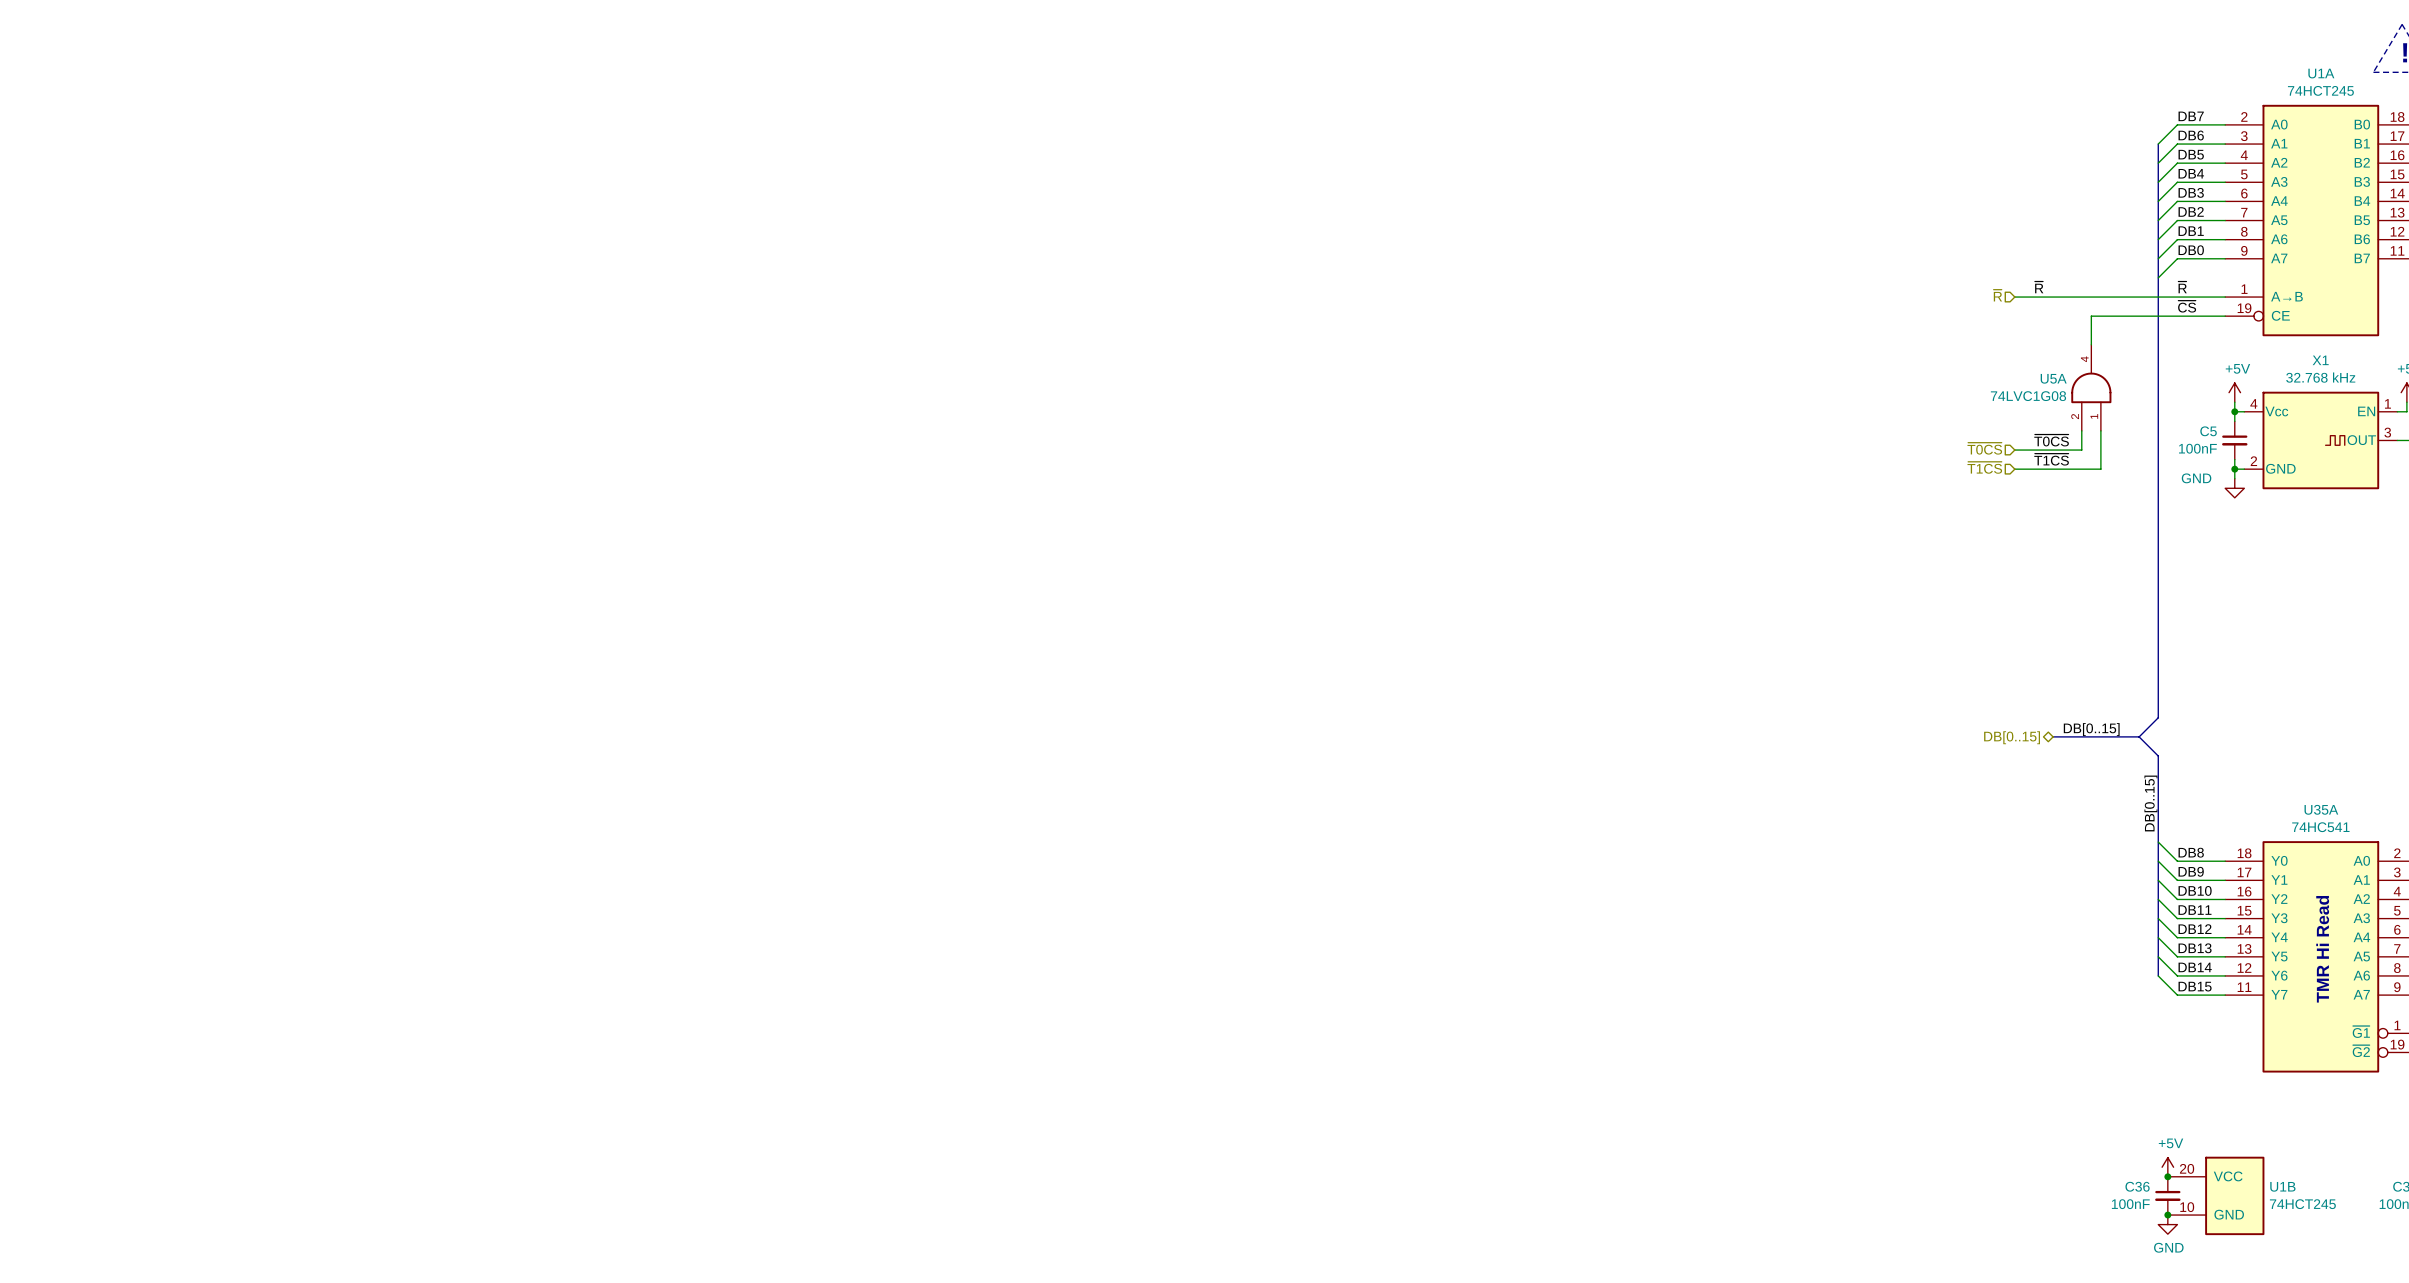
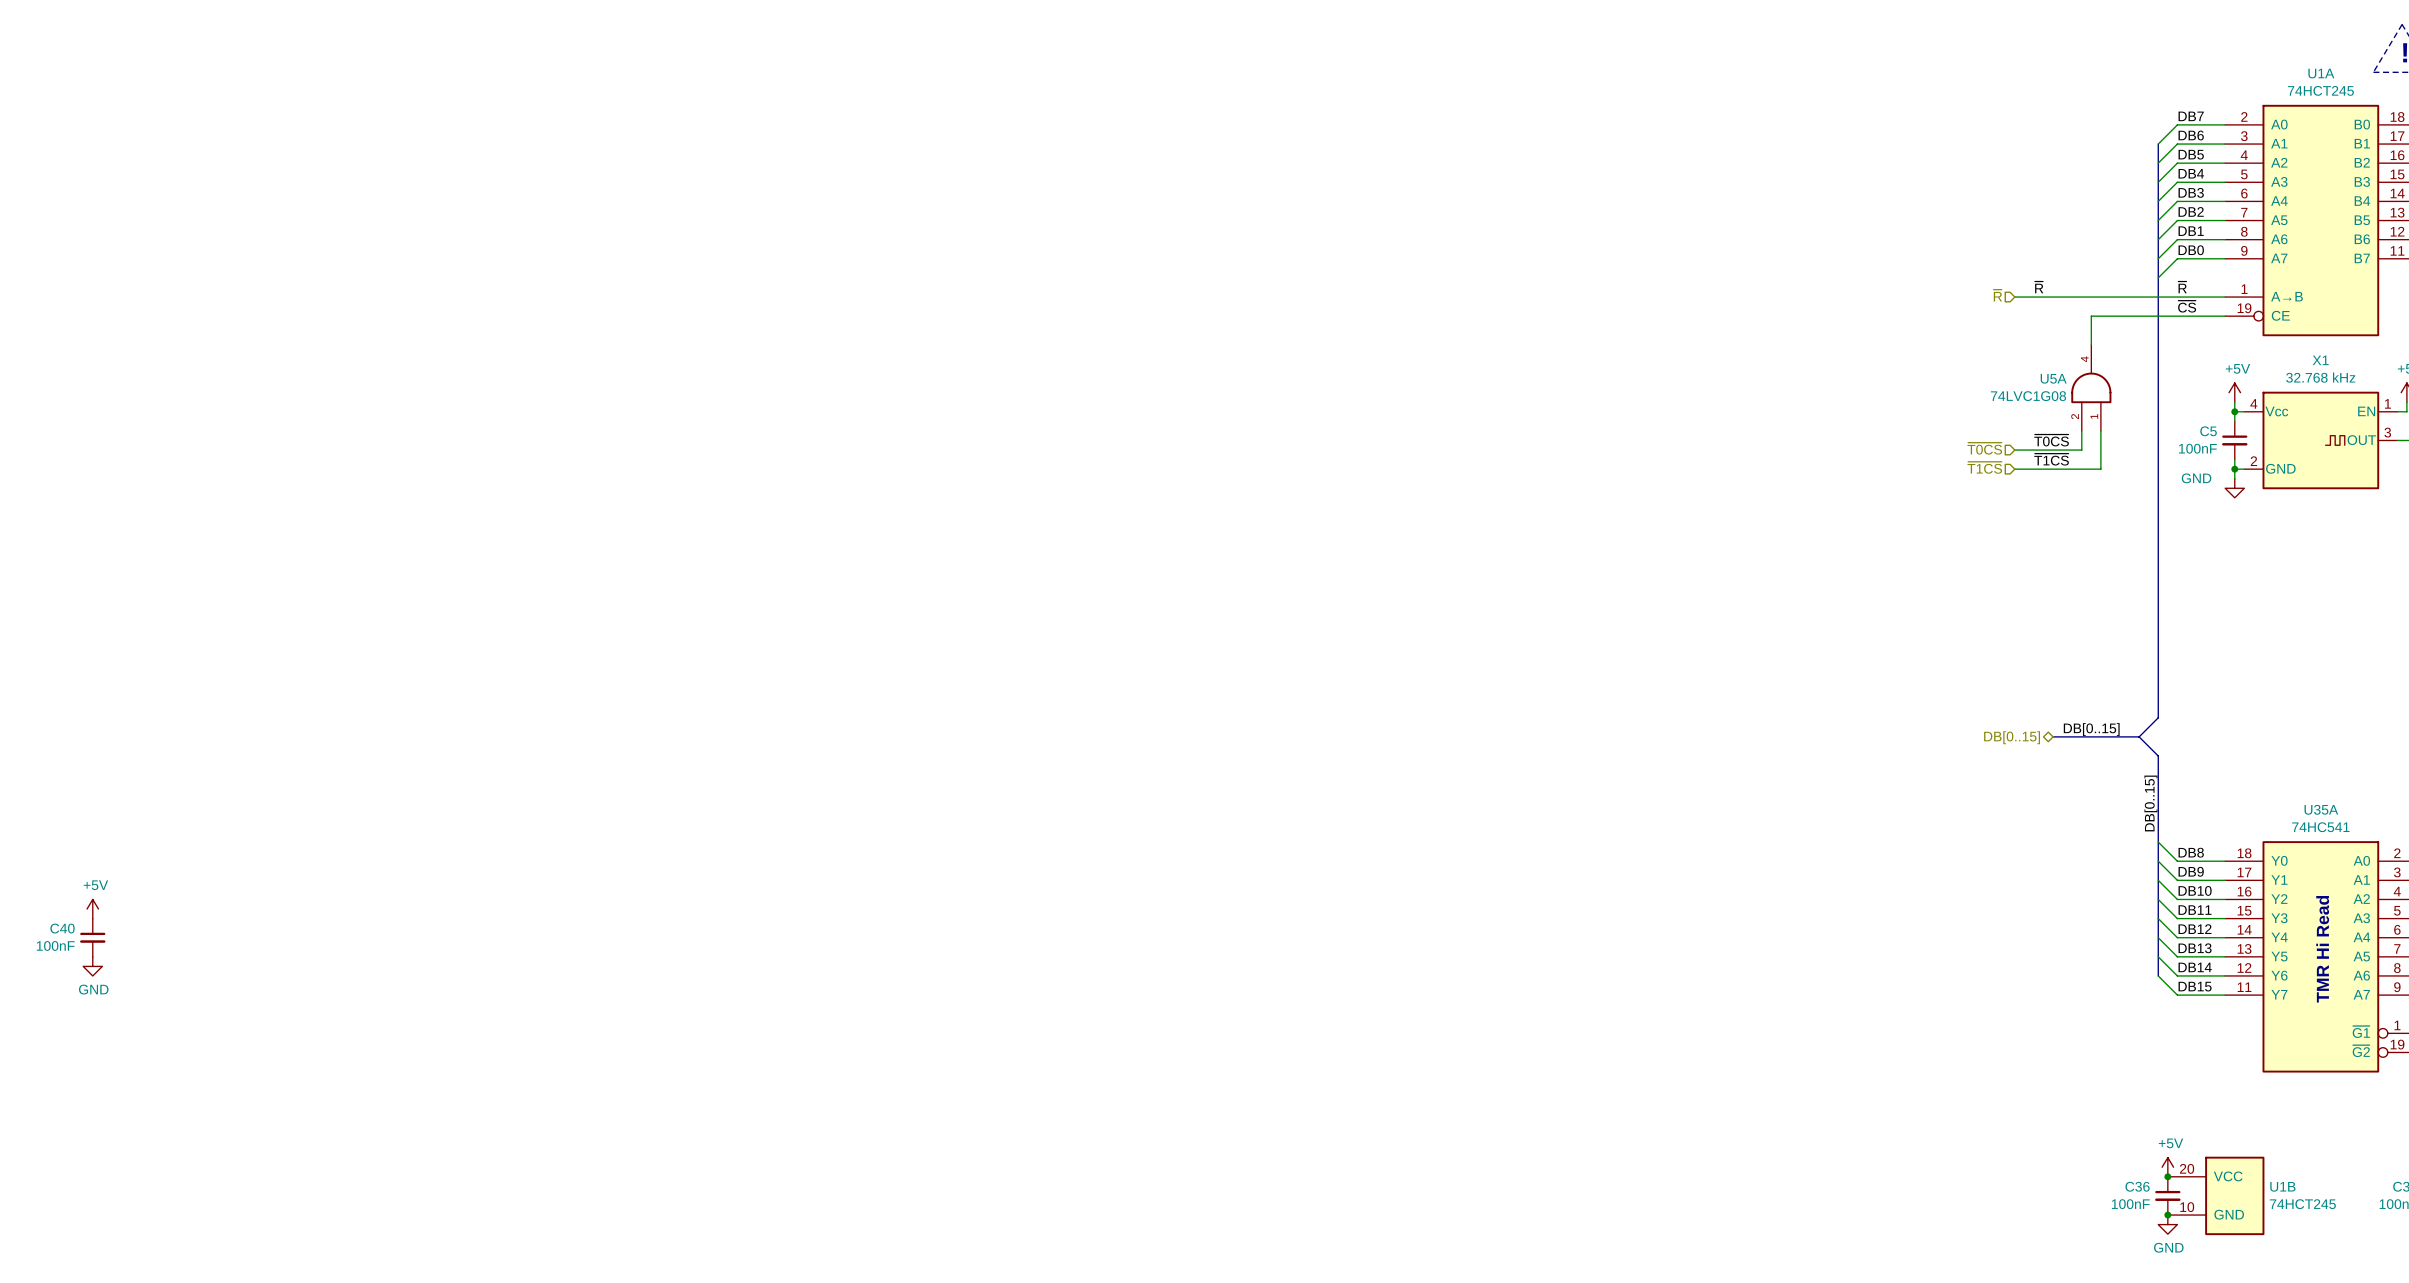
power symbol: none -> +5V (92, 909)
C40: none -> 100nF (92, 937)
power symbol: none -> GND (92, 966)

